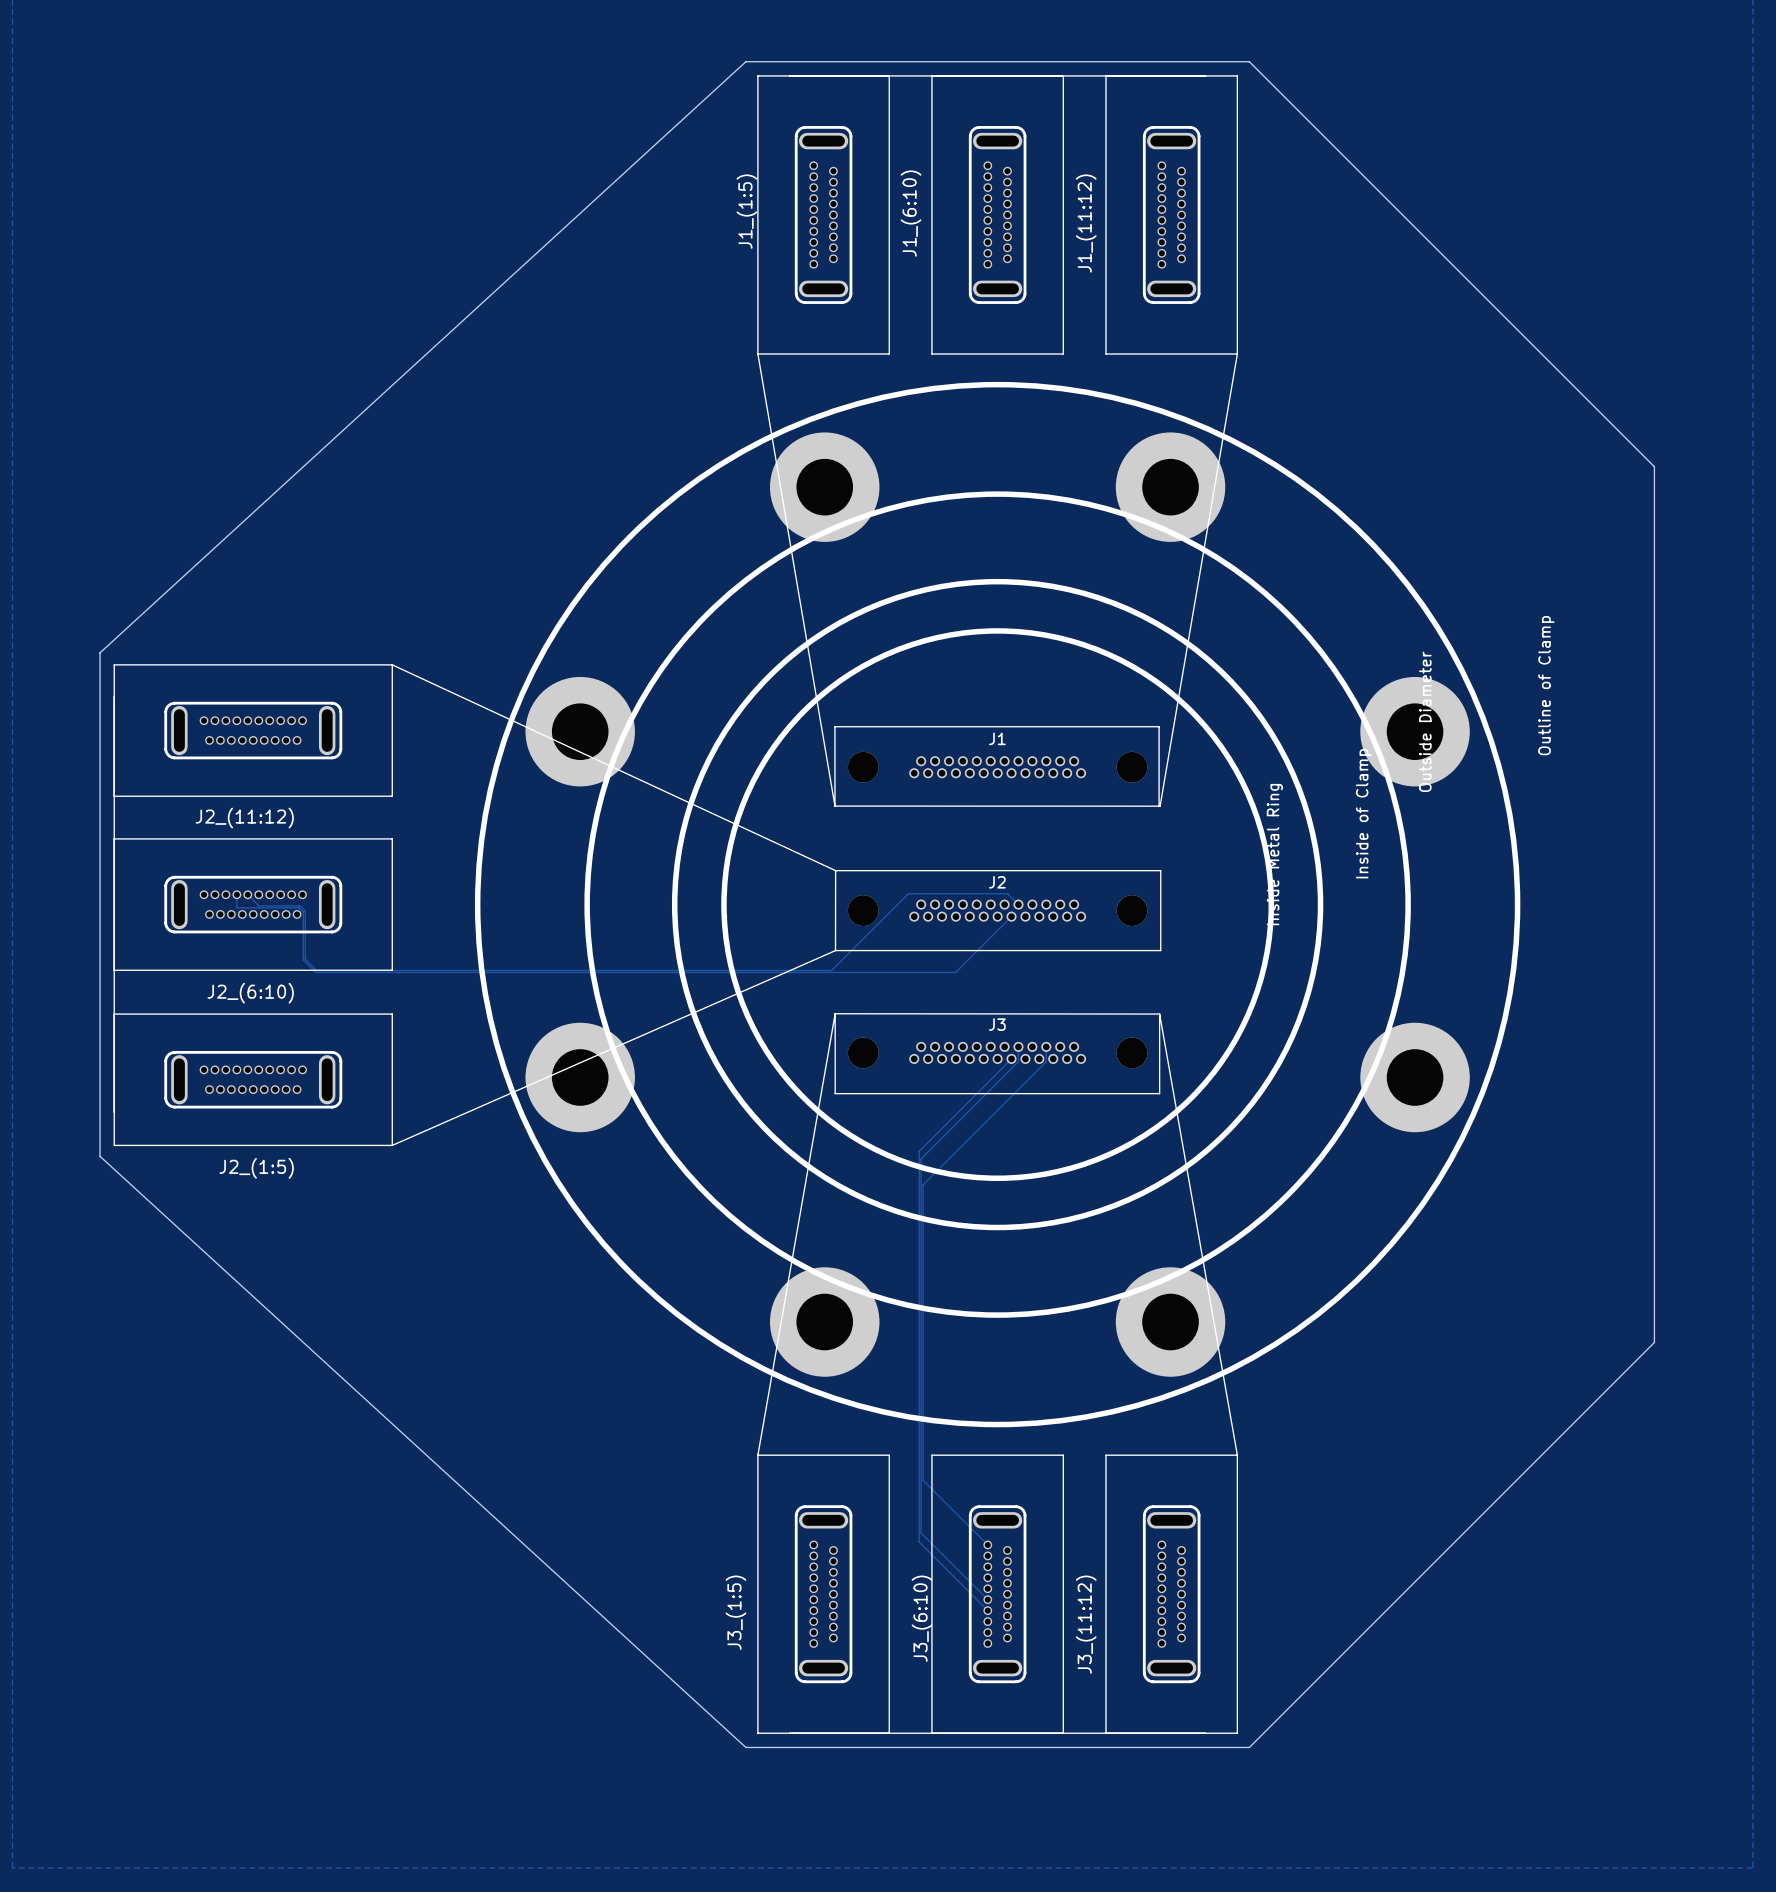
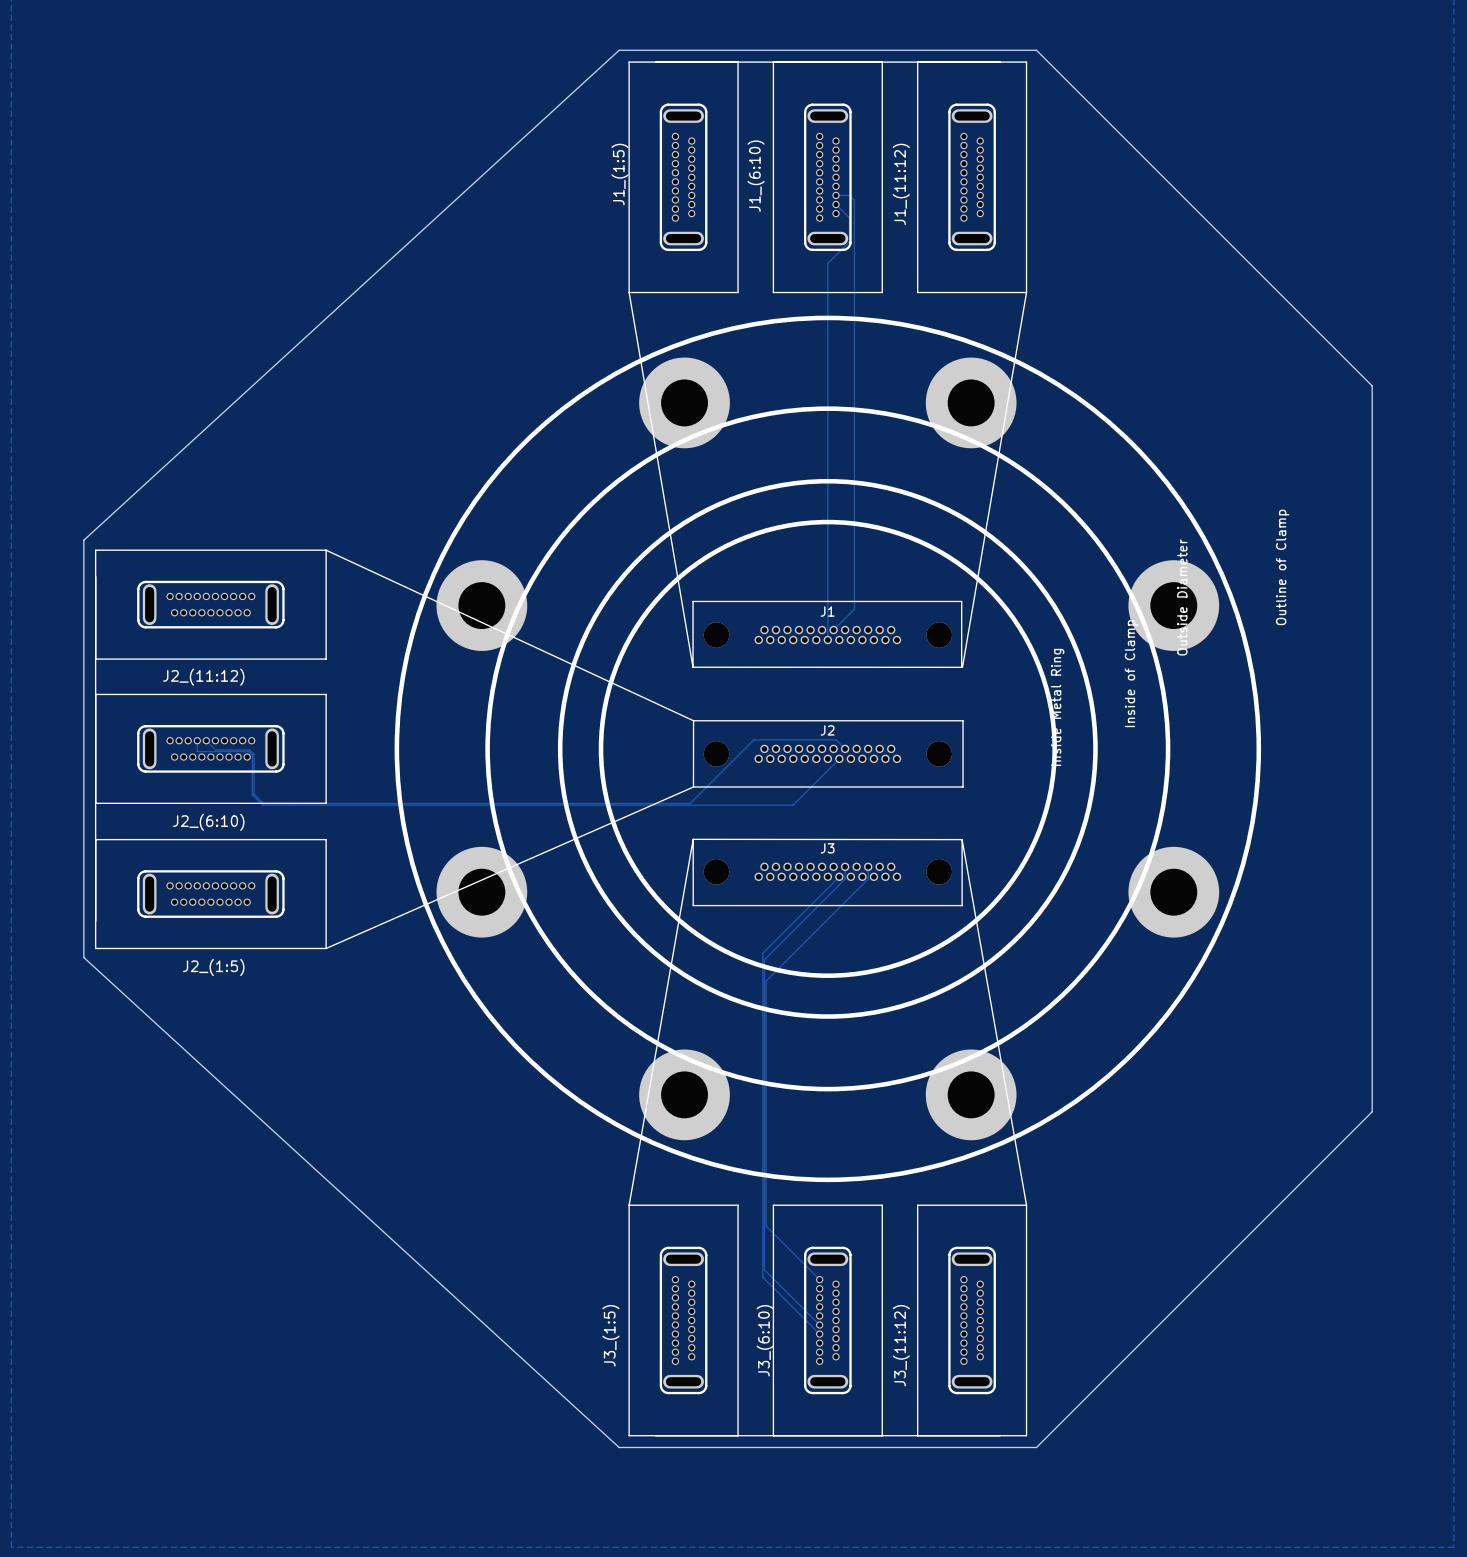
track: none -> (836, 195) (849, 195) (854, 200) (854, 609) (833, 630)
track: none -> (836, 204) (849, 218) (849, 241) (827, 263) (827, 640)

